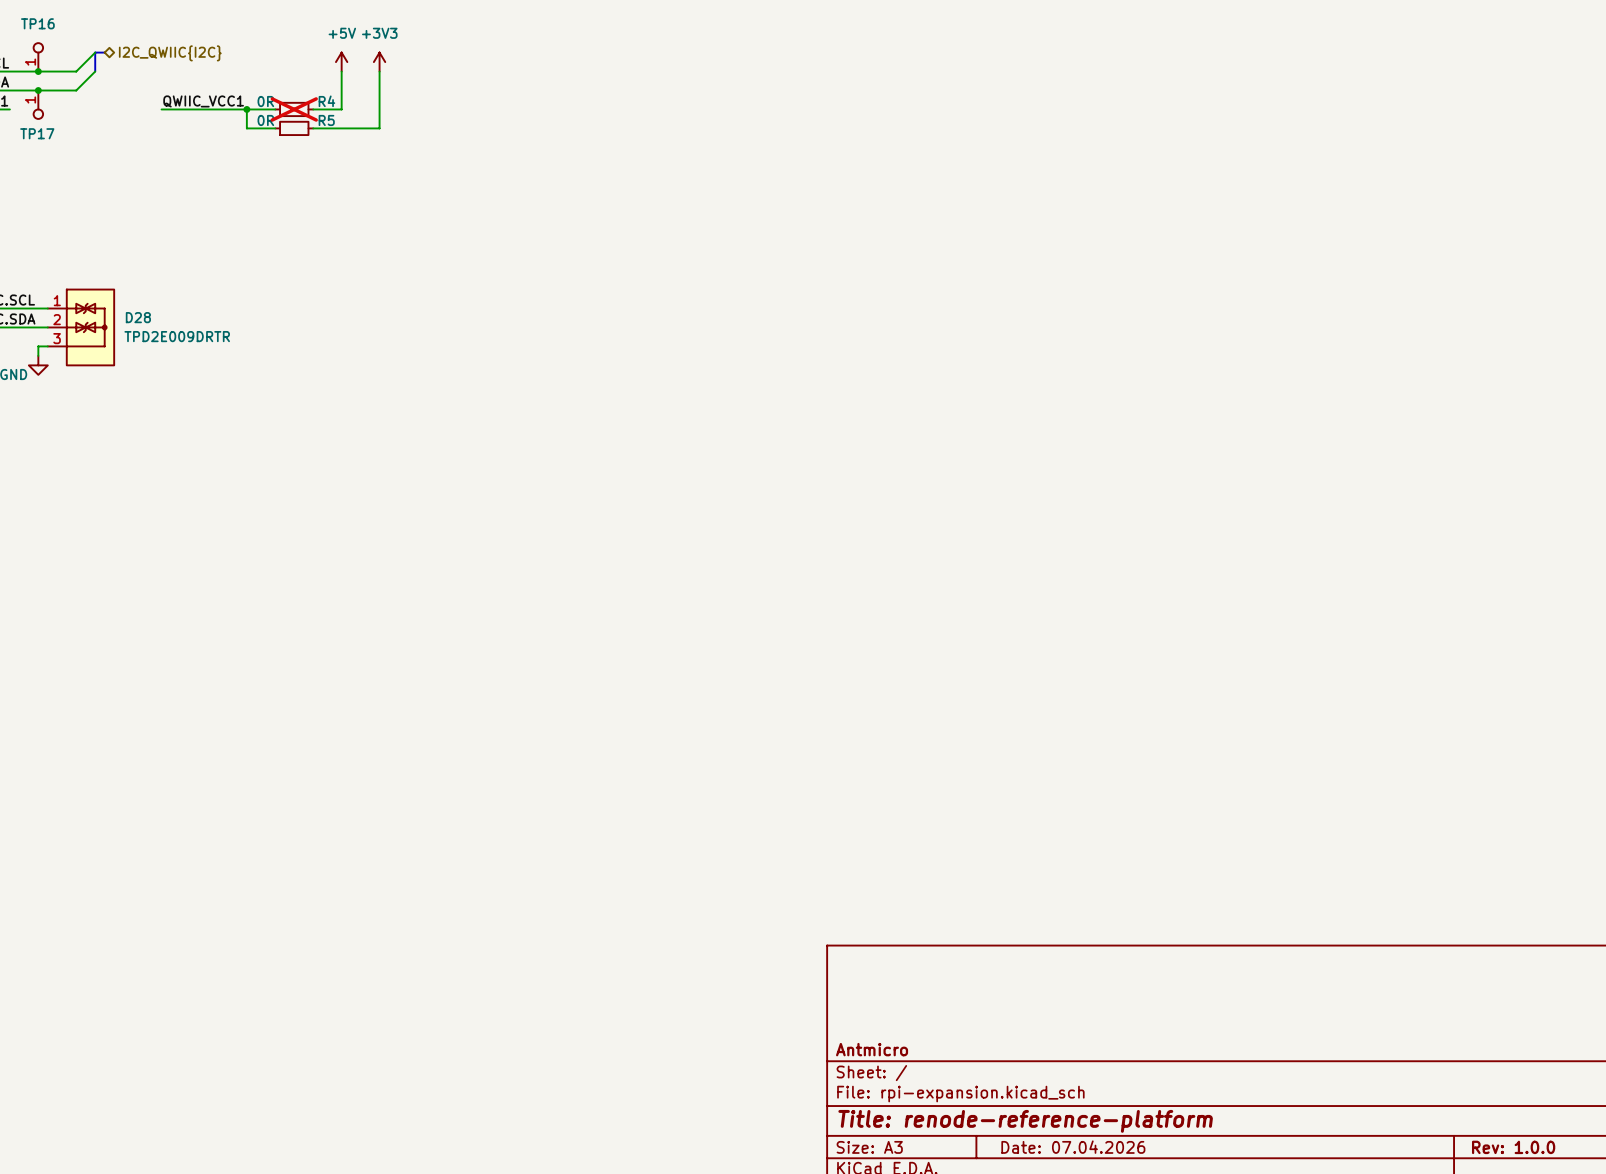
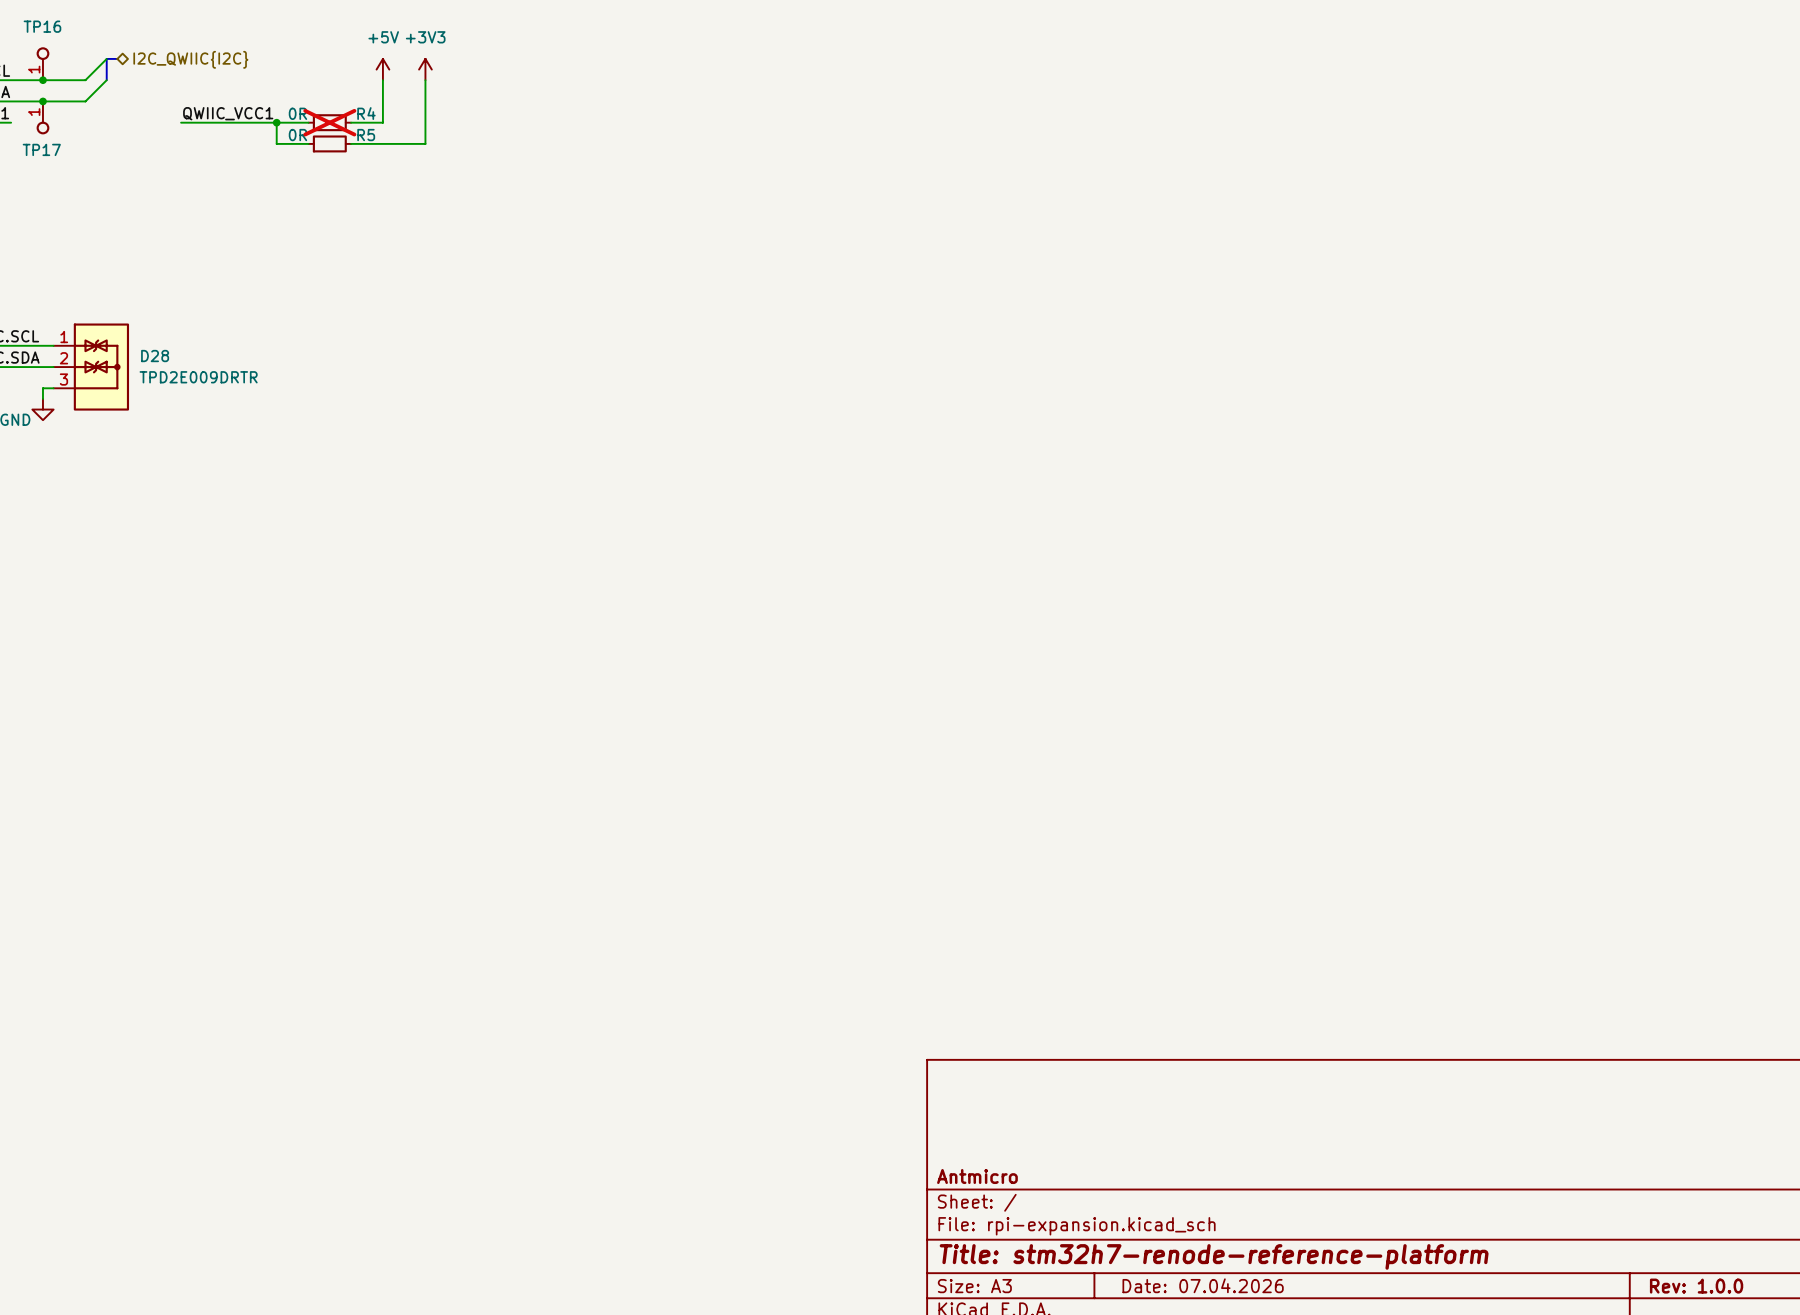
title block: Title: renode-reference-platform (1025, 1121) -> Title: stm32h7-renode-reference-platform (1214, 1256)

